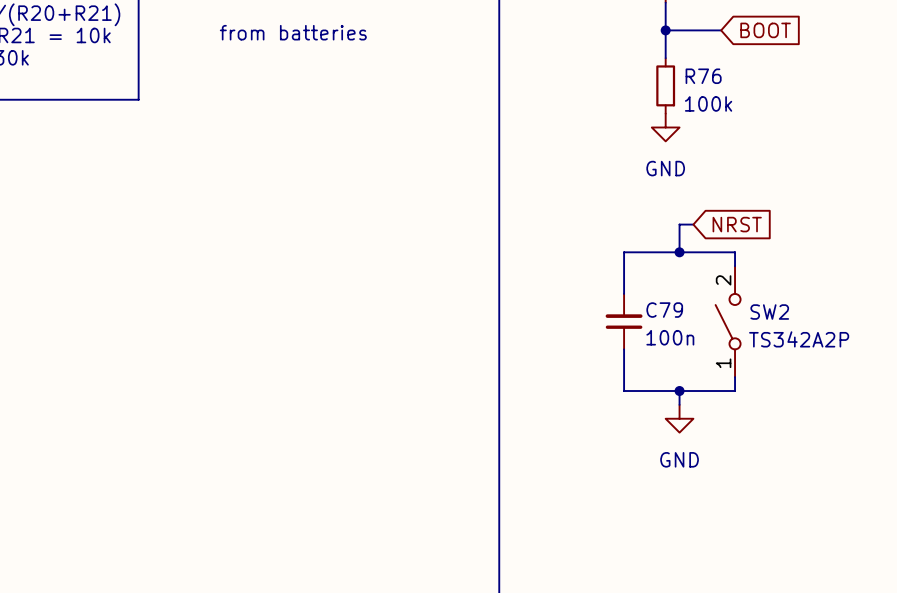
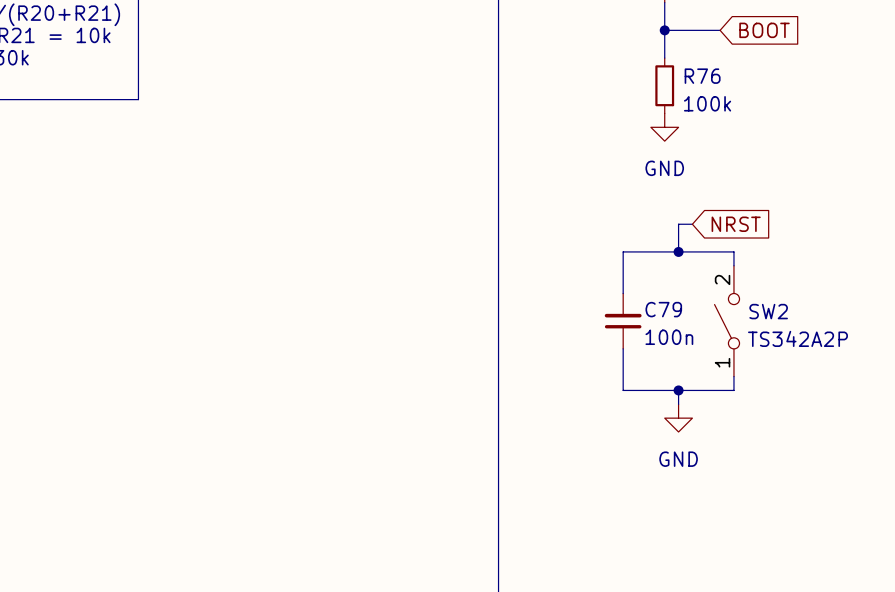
text: from batteries (293, 32) -> none

